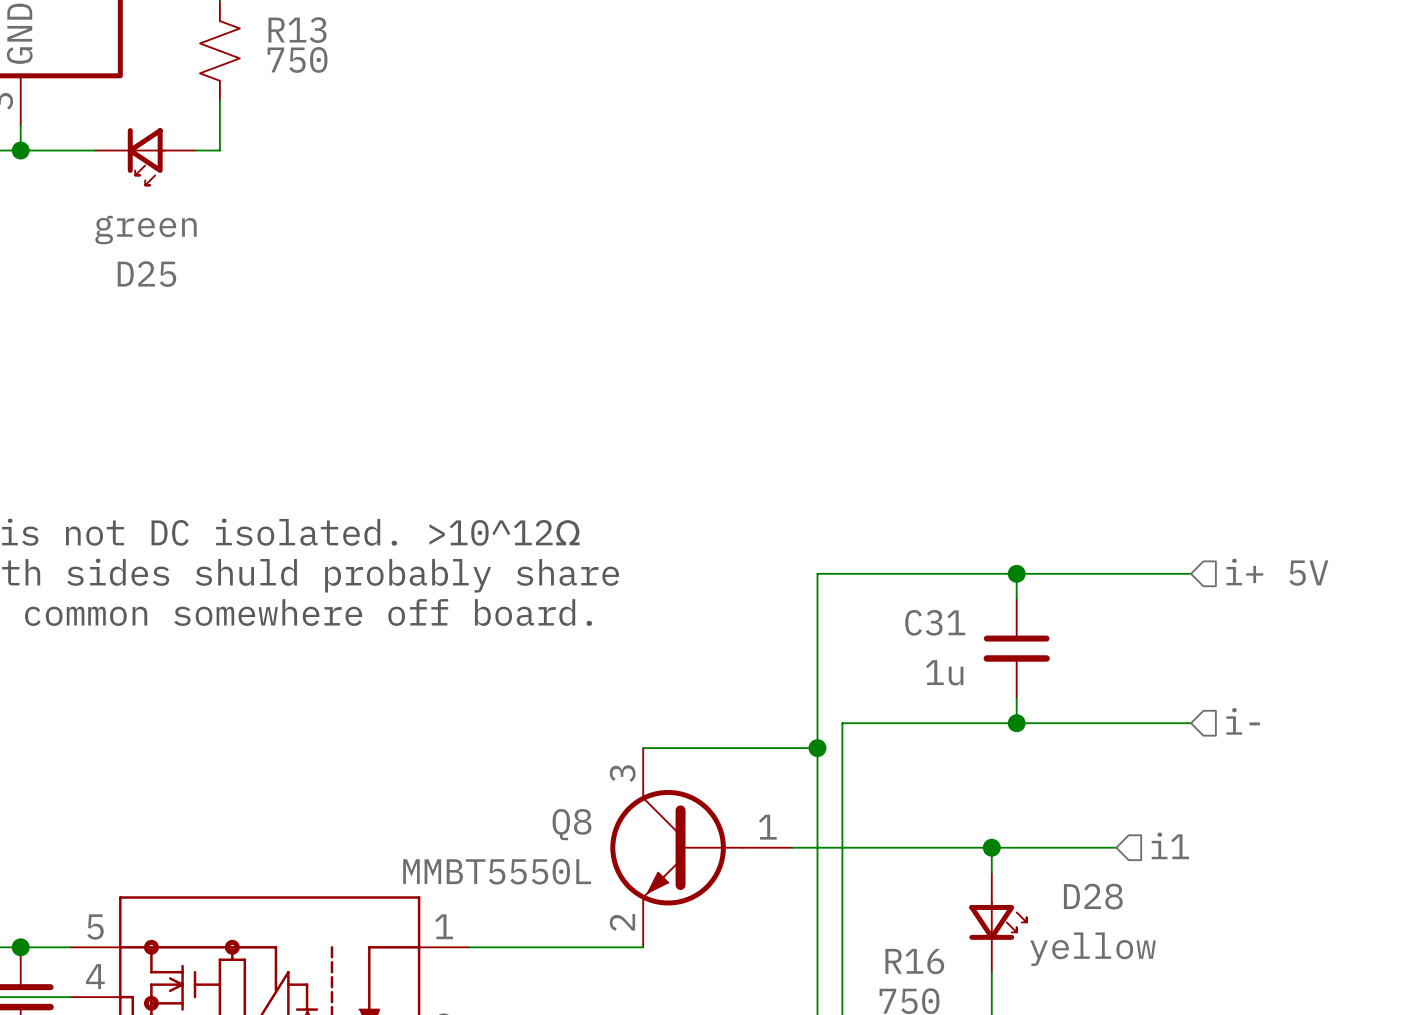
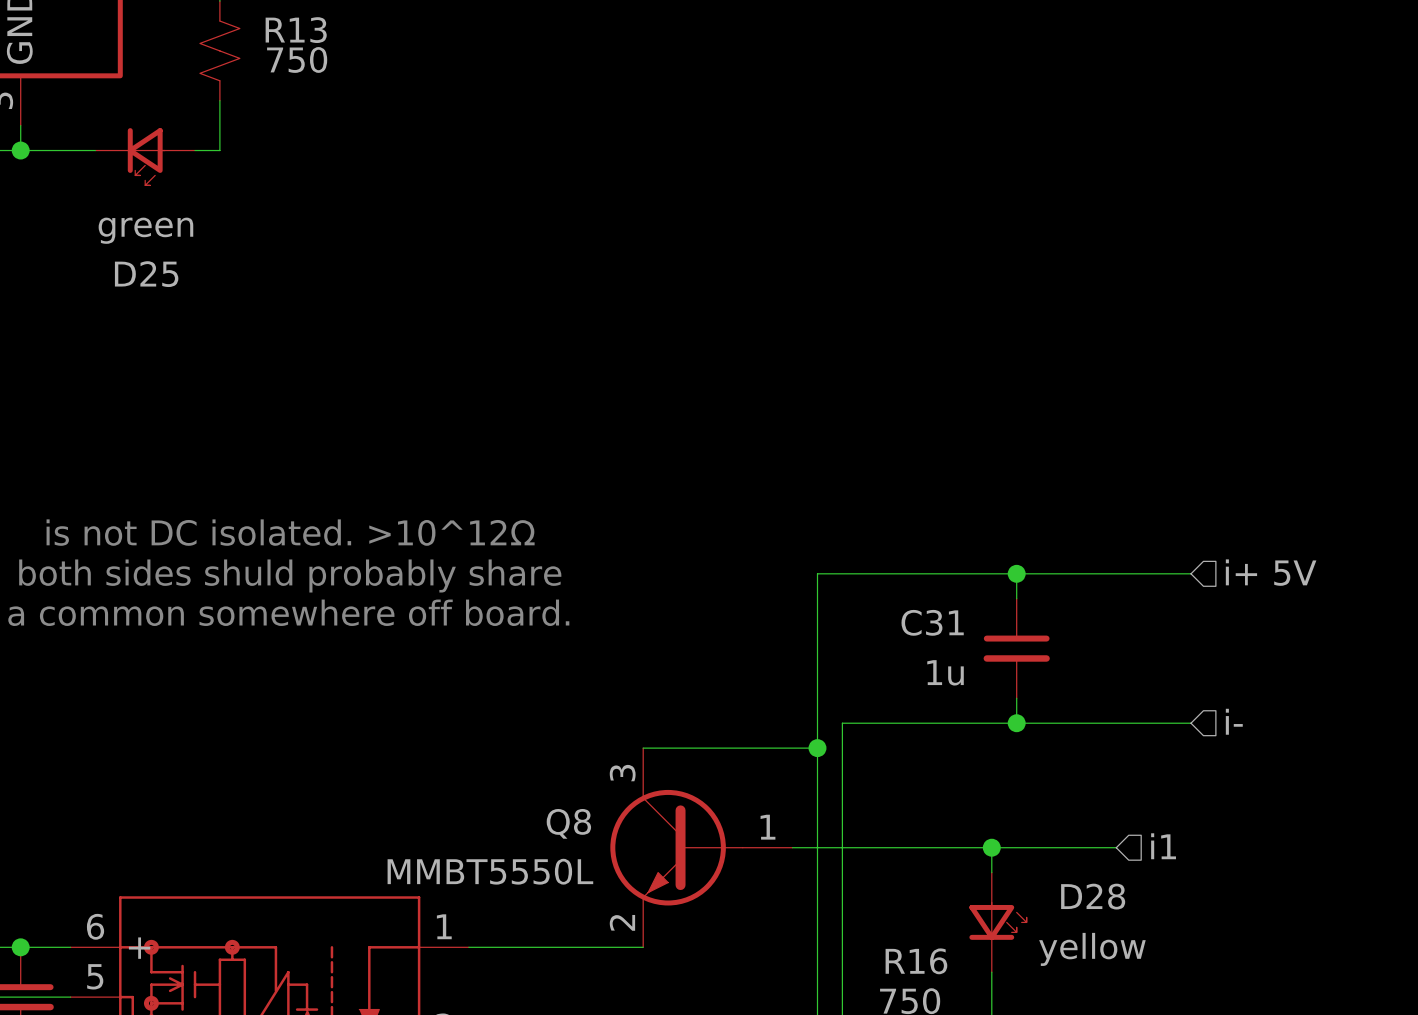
part pin number: 5 (95, 926) -> 6 (95, 926)
part pin name: none -> + (139, 948)
part pin number: 4 (95, 976) -> 5 (95, 976)

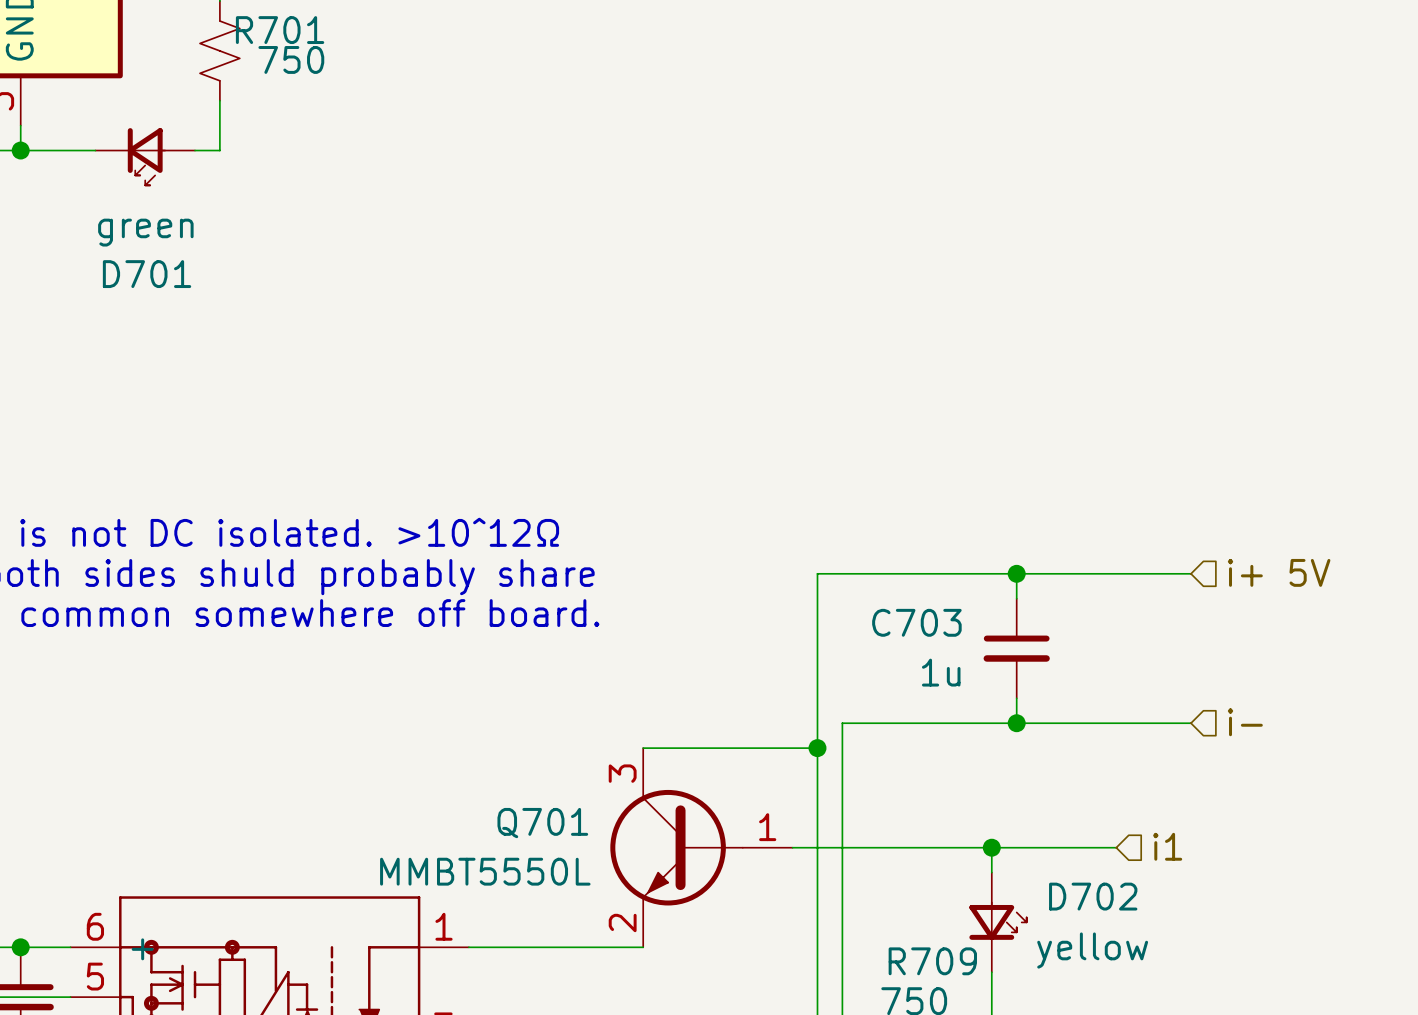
R13 name: R13 (296, 30) -> R701 (280, 30)
D25 name: D25 (146, 274) -> D701 (147, 274)
C31 name: C31 (932, 622) -> C703 (916, 622)
Q8 name: Q8 (568, 823) -> Q701 (542, 823)
D28 name: D28 (1093, 896) -> D702 (1093, 896)
R16 name: R16 (916, 961) -> R709 (932, 961)

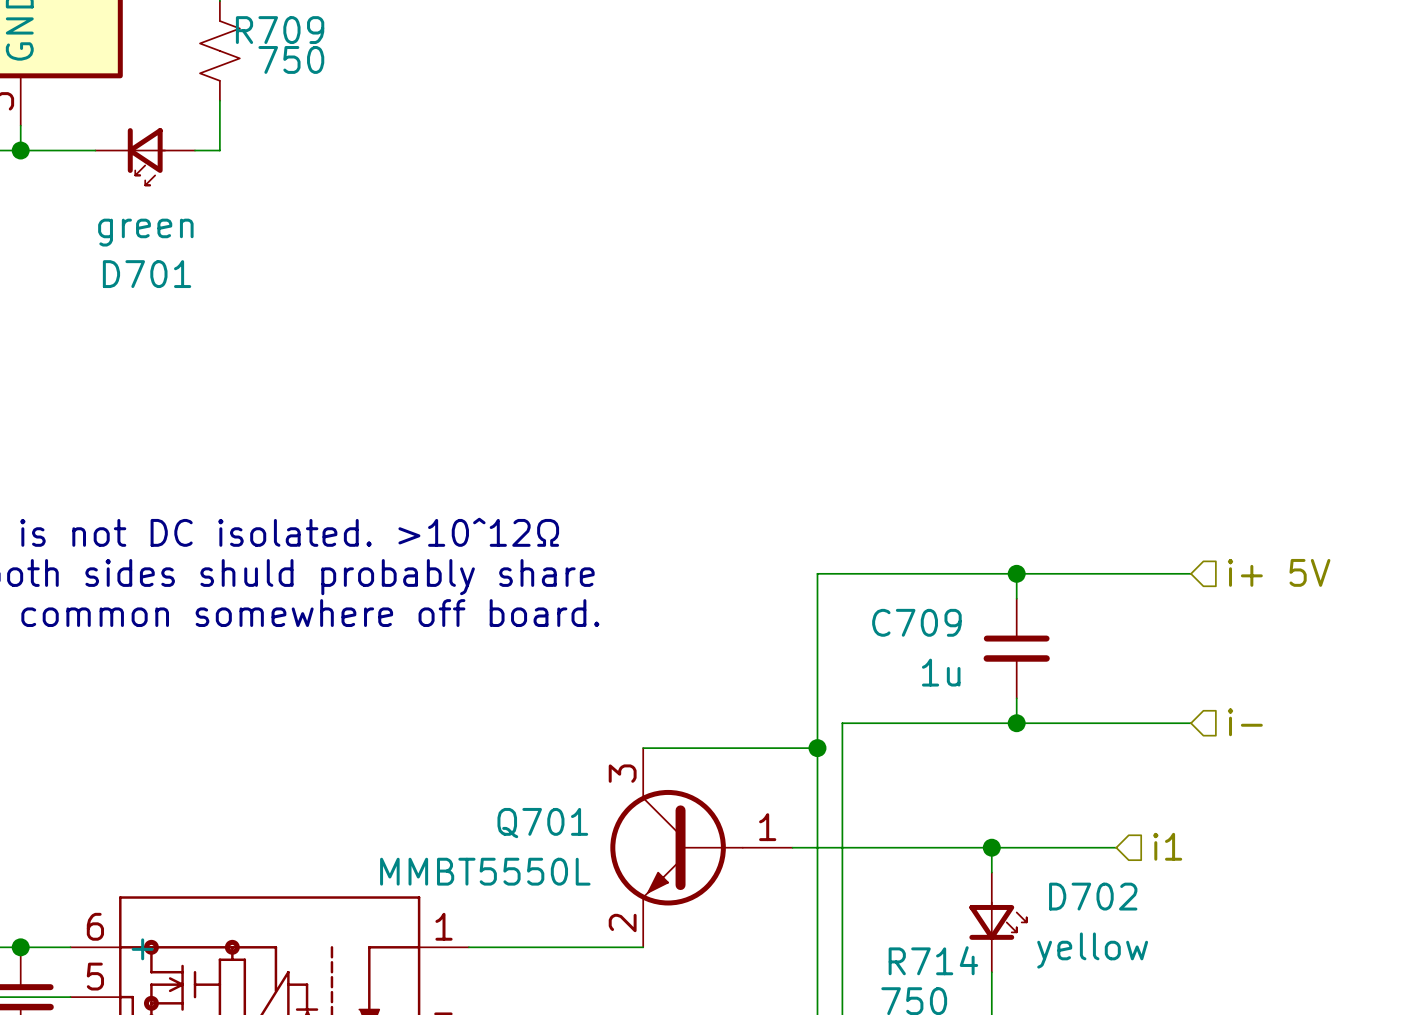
R701 name: R701 (280, 30) -> R709 (280, 30)
C703 name: C703 (916, 622) -> C709 (916, 622)
R709 name: R709 (932, 961) -> R714 (933, 960)

